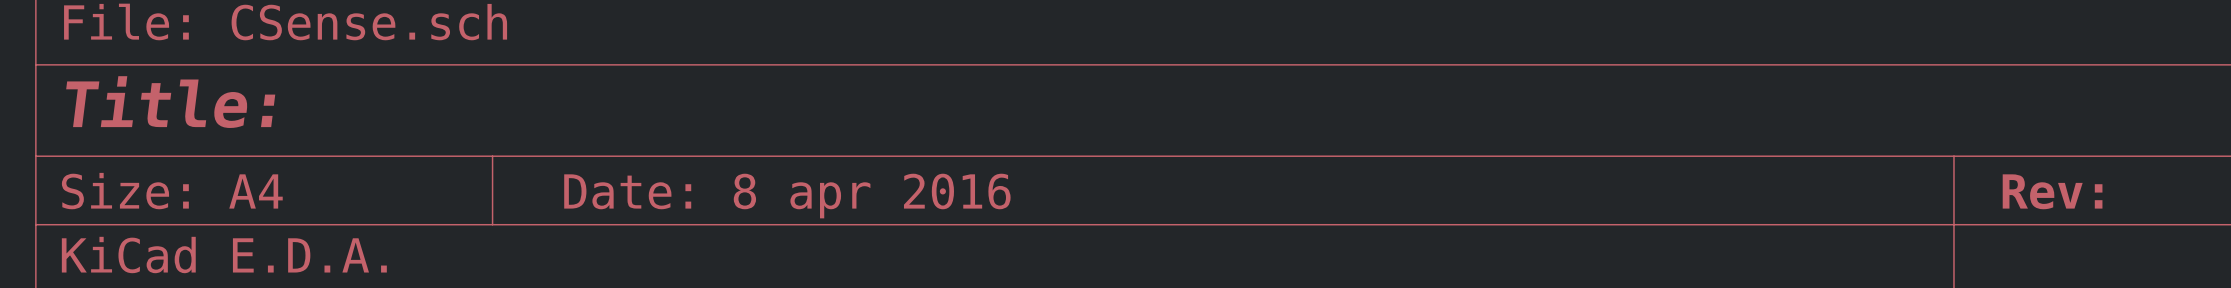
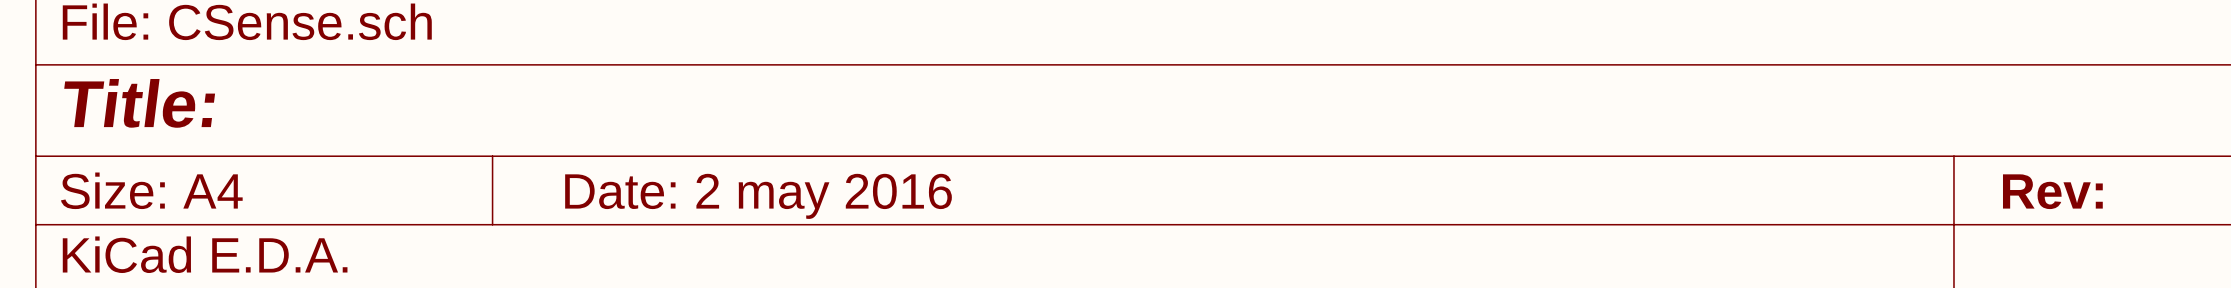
title block: Date: 8 apr 2016 (787, 196) -> Date: 2 may 2016 (758, 196)

